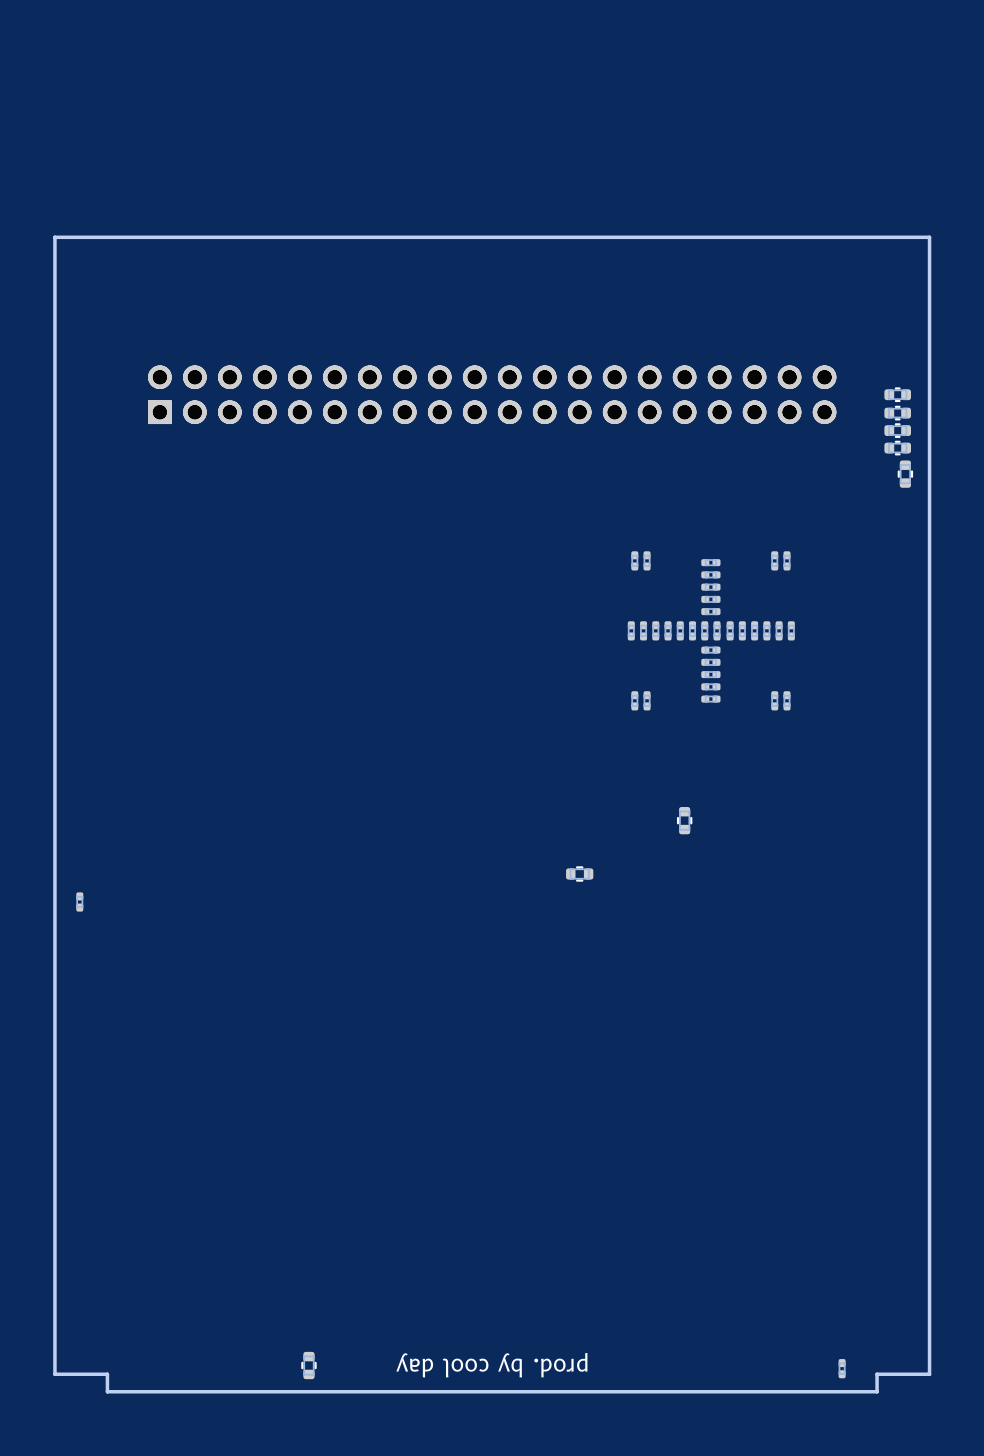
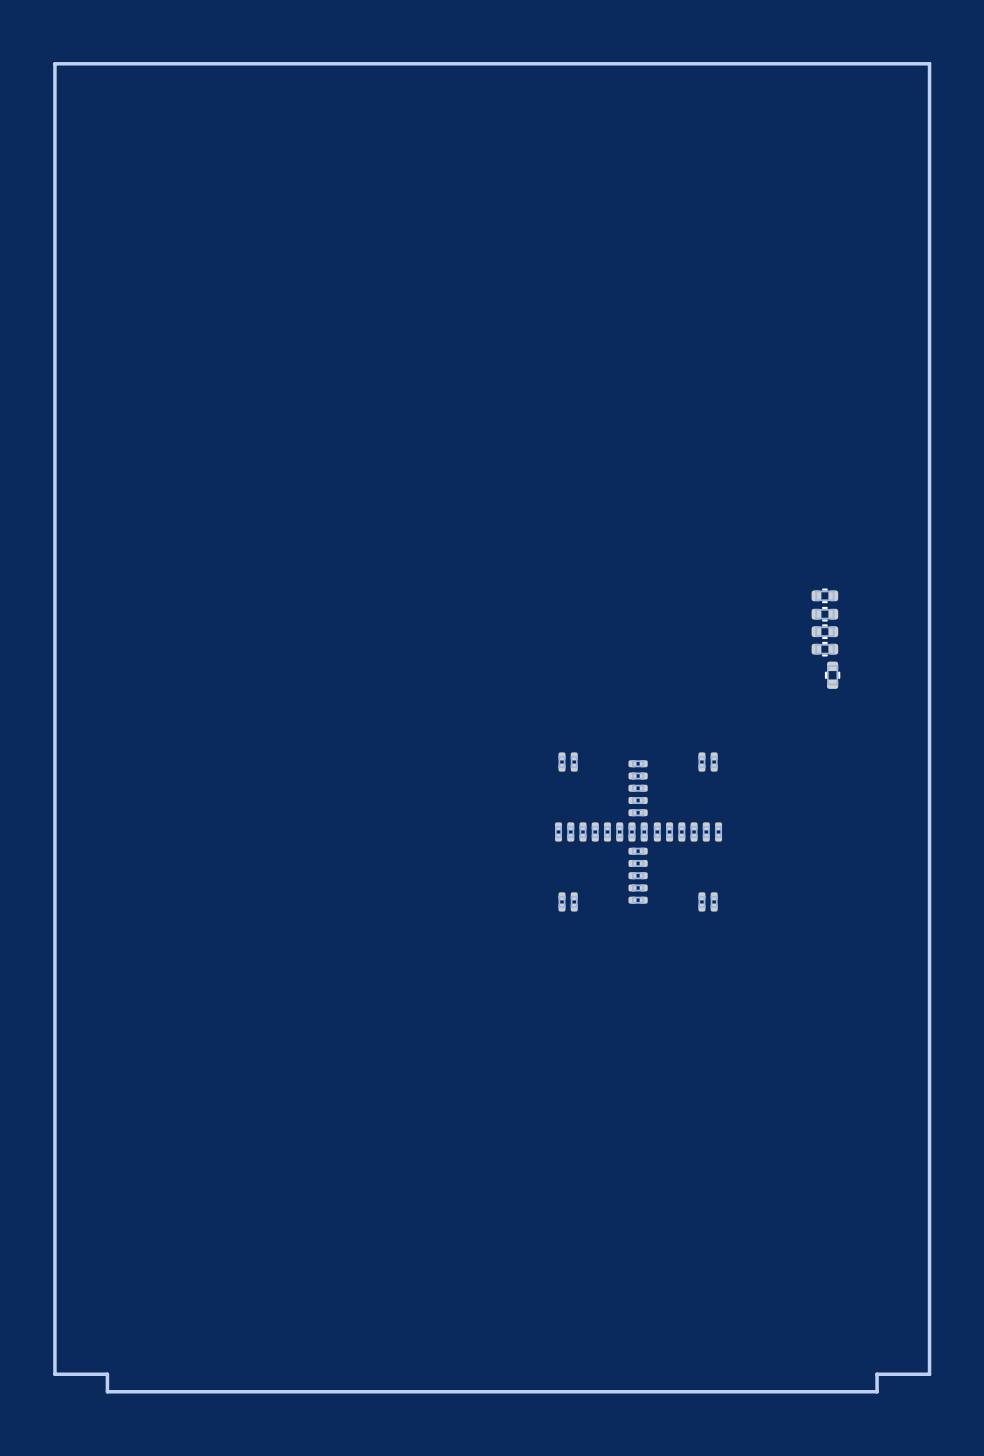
board edge: (929, 237) (54, 237) -> (929, 237) (929, 63) (54, 63) (54, 237)
part: (492, 394) -> none
part: (897, 394) -> none
part: (897, 413) -> none
part: (897, 430) -> none
part: (897, 448) -> none
part: (905, 474) -> none
part: (634, 560) -> none
part: (647, 560) -> none
part: (774, 560) -> none
part: (786, 560) -> none
part: (710, 562) -> none
part: (710, 574) -> none
part: (710, 587) -> none
part: none -> (824, 595)
part: (710, 599) -> none
part: (710, 611) -> none
part: none -> (824, 614)
part: (631, 630) -> none
part: (643, 630) -> none
part: (655, 630) -> none
part: (668, 630) -> none
part: (680, 630) -> none
part: (692, 630) -> none
part: (704, 630) -> none
part: (717, 630) -> none
part: (730, 630) -> none
part: (742, 630) -> none
part: (754, 630) -> none
part: (766, 630) -> none
part: (779, 630) -> none
part: (791, 630) -> none
part: none -> (824, 631)
part: none -> (824, 649)
part: (710, 650) -> none
part: (710, 662) -> none
part: (710, 674) -> none
part: none -> (832, 675)
part: (710, 686) -> none
part: (710, 699) -> none
part: (634, 700) -> none
part: (647, 700) -> none
part: (774, 700) -> none
part: (786, 700) -> none
part: none -> (561, 762)
part: none -> (574, 762)
part: none -> (701, 762)
part: none -> (714, 762)
part: none -> (638, 763)
part: none -> (638, 776)
part: none -> (638, 788)
part: none -> (638, 800)
part: none -> (638, 812)
part: (684, 820) -> none
part: none -> (558, 831)
part: none -> (570, 831)
part: none -> (582, 831)
part: none -> (595, 831)
part: none -> (607, 831)
part: none -> (619, 831)
part: none -> (631, 831)
part: none -> (644, 831)
part: none -> (657, 831)
part: none -> (669, 831)
part: none -> (681, 831)
part: none -> (694, 831)
part: none -> (706, 831)
part: none -> (718, 831)
part: none -> (638, 851)
part: none -> (638, 863)
part: (579, 874) -> none
part: none -> (638, 875)
part: none -> (638, 887)
part: none -> (638, 900)
part: (79, 901) -> none
part: none -> (561, 901)
part: none -> (574, 901)
part: none -> (701, 901)
part: none -> (714, 901)
part: (308, 1365) -> none
part: (491, 1365) -> none
part: (842, 1368) -> none

